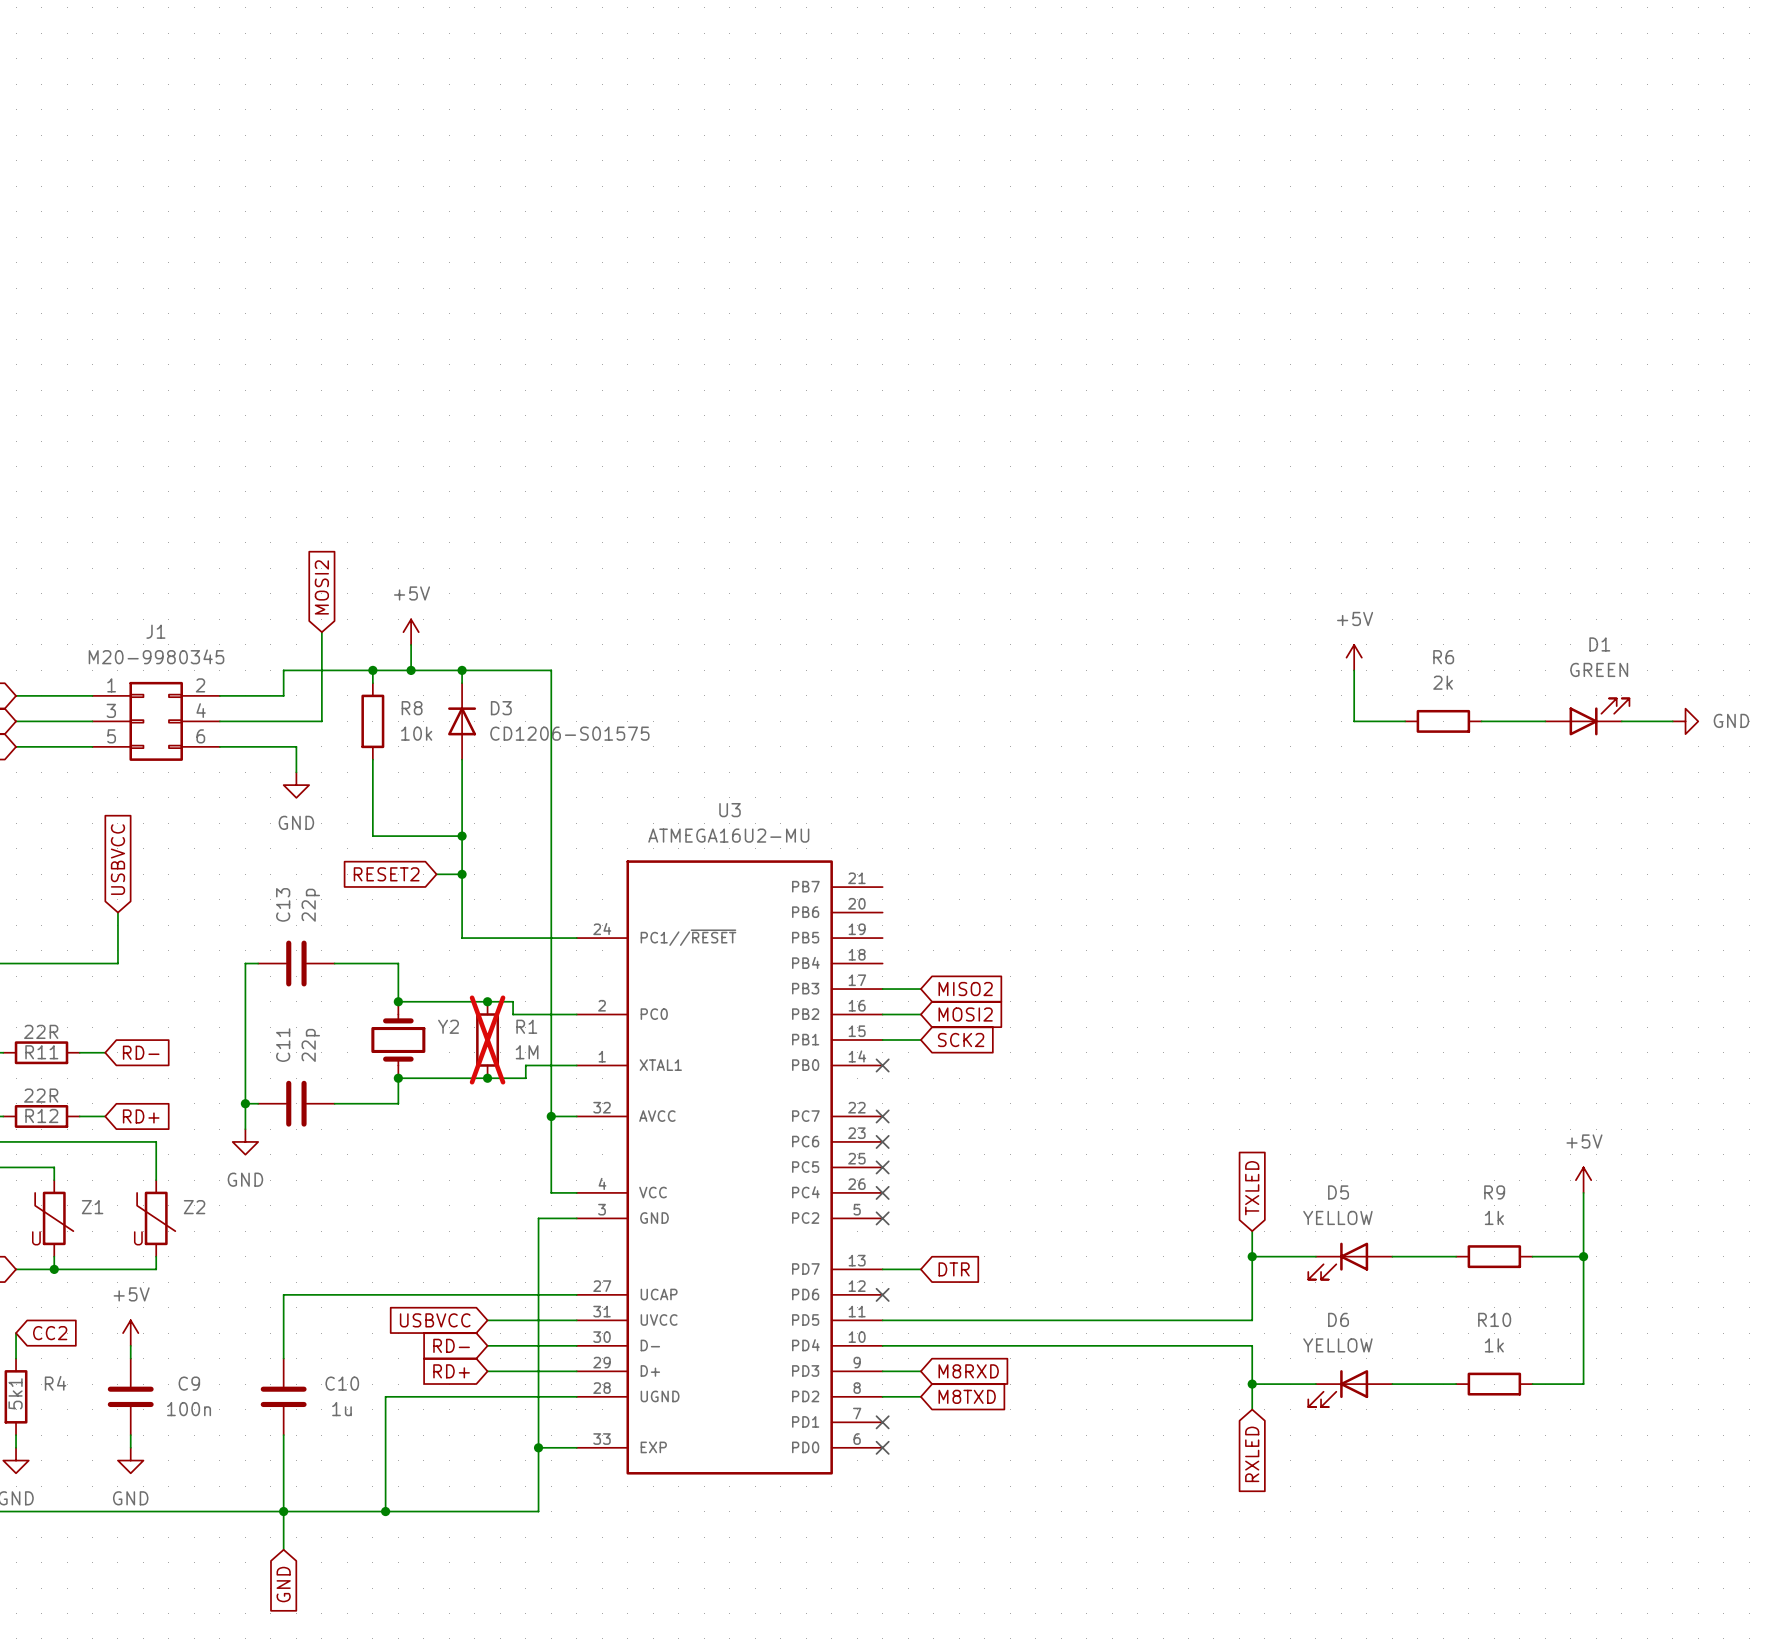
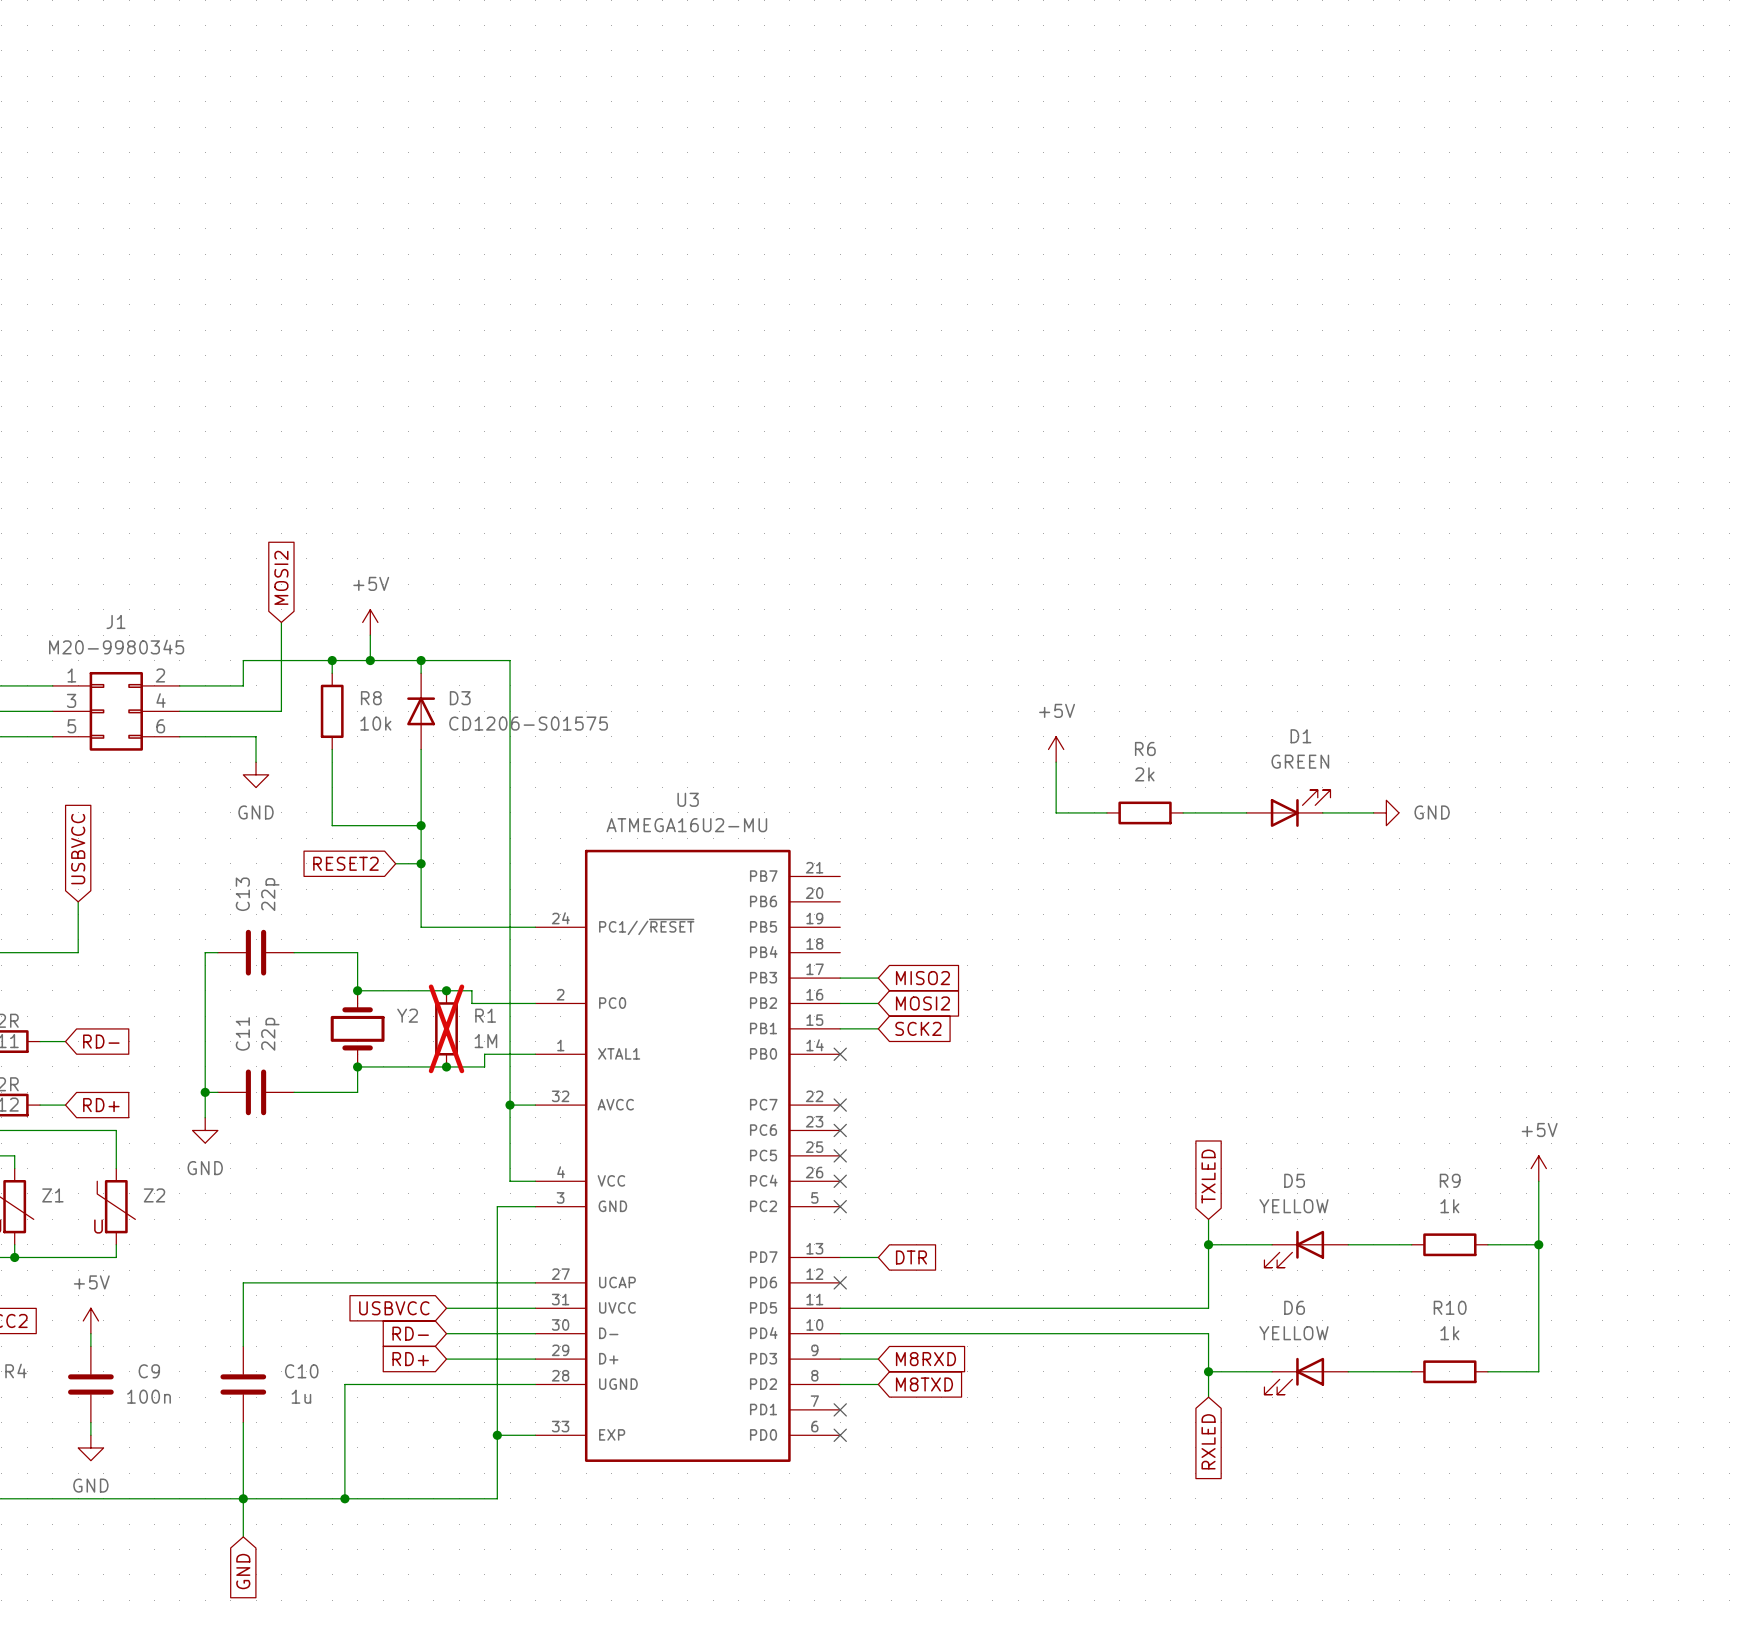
power symbol: +5V (1354, 657) -> none
wire: (1354, 670) (1354, 721) (1405, 721) -> none
D1 position: (1587, 716) -> (1288, 808)
R6 position: (1443, 721) -> (1145, 812)
wire: (1481, 721) (1545, 721) -> none
wire: (1621, 721) (1672, 721) -> none
power symbol: GND (1685, 721) -> none
power symbol: none -> +5V (1056, 749)
wire: none -> (1056, 762) (1056, 812) (1106, 812)
wire: none -> (1183, 812) (1246, 812)
wire: none -> (1322, 812) (1373, 812)
power symbol: none -> GND (1386, 812)

